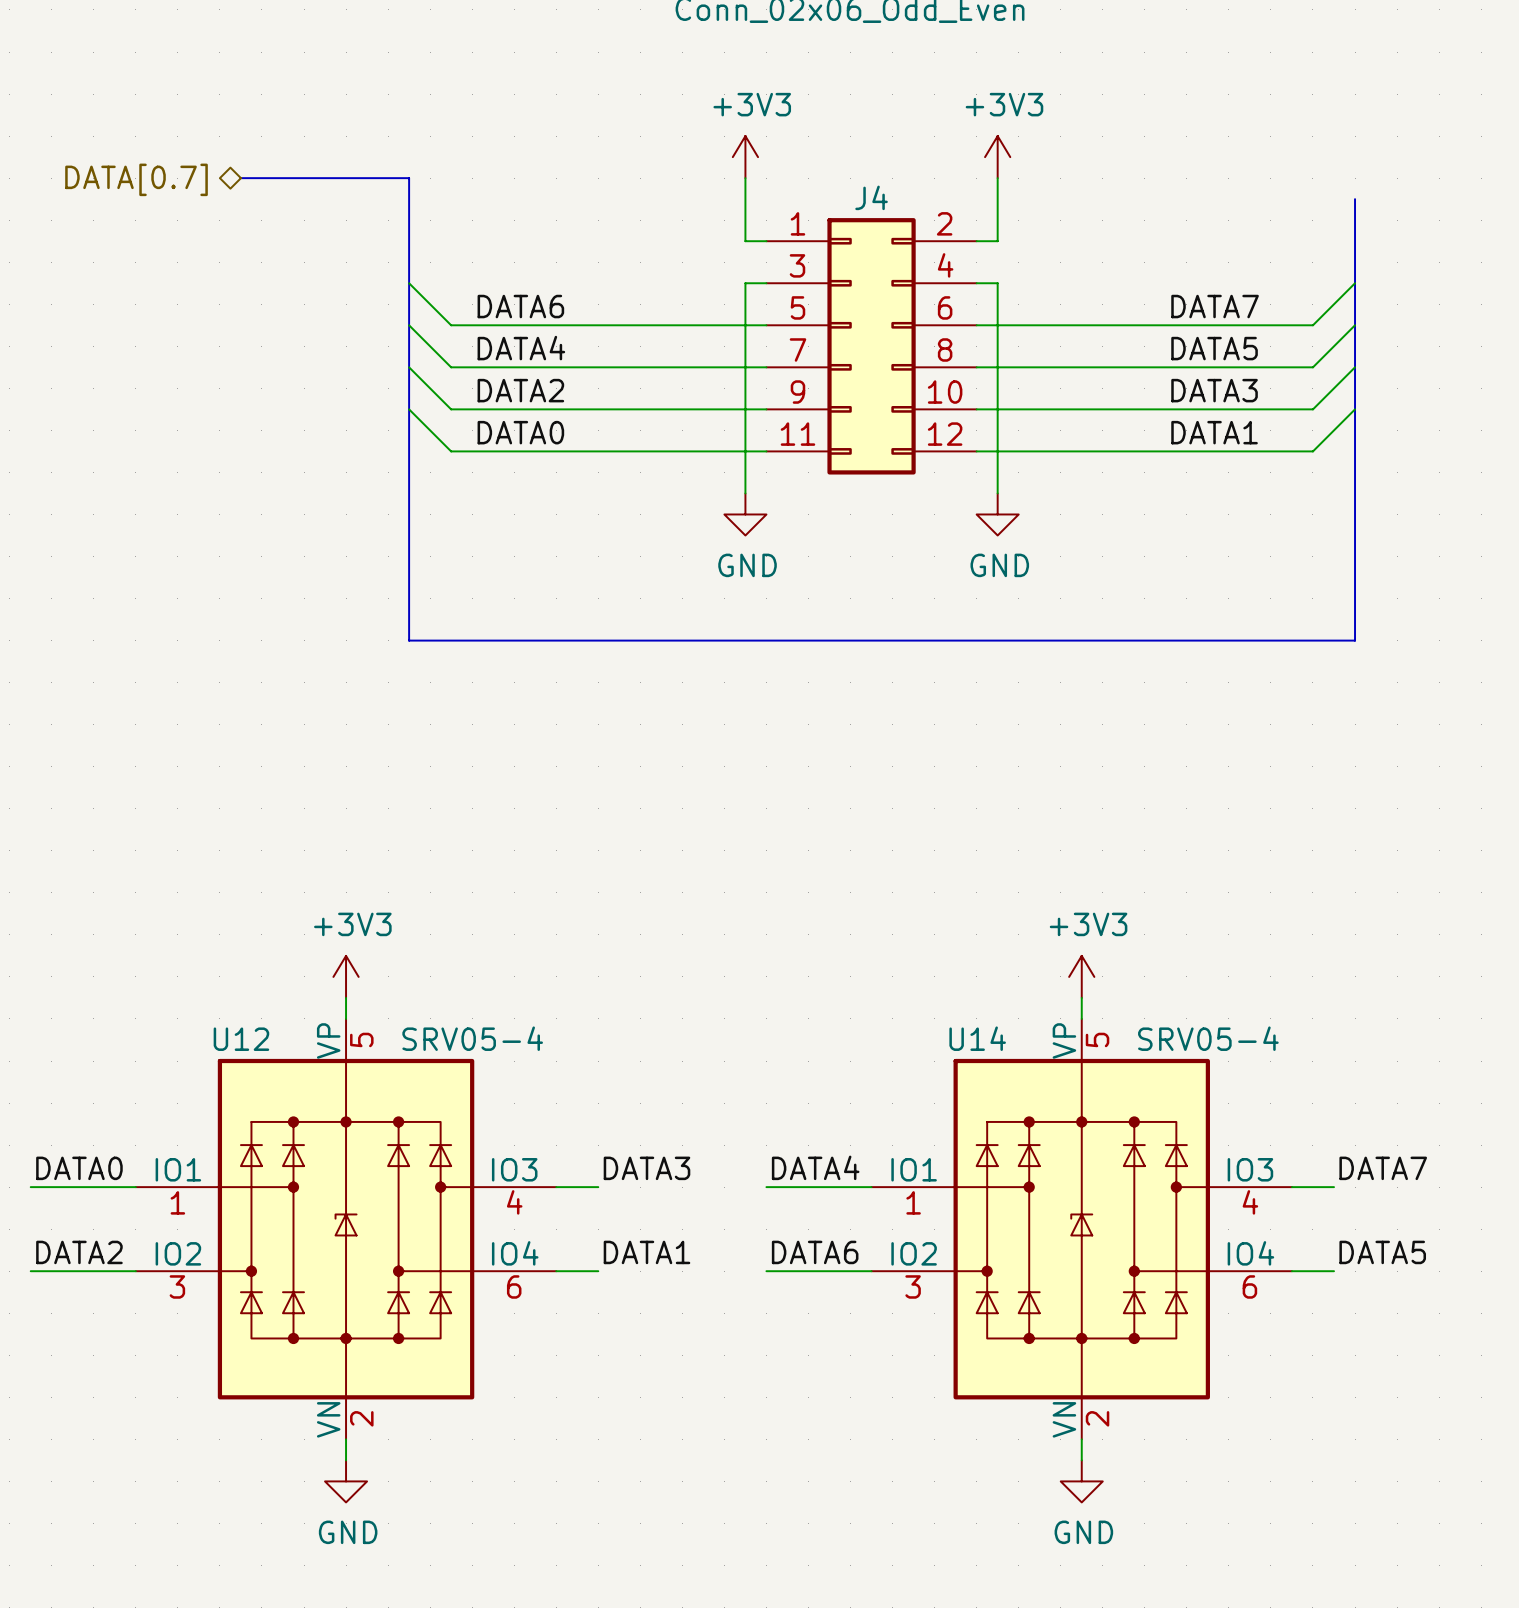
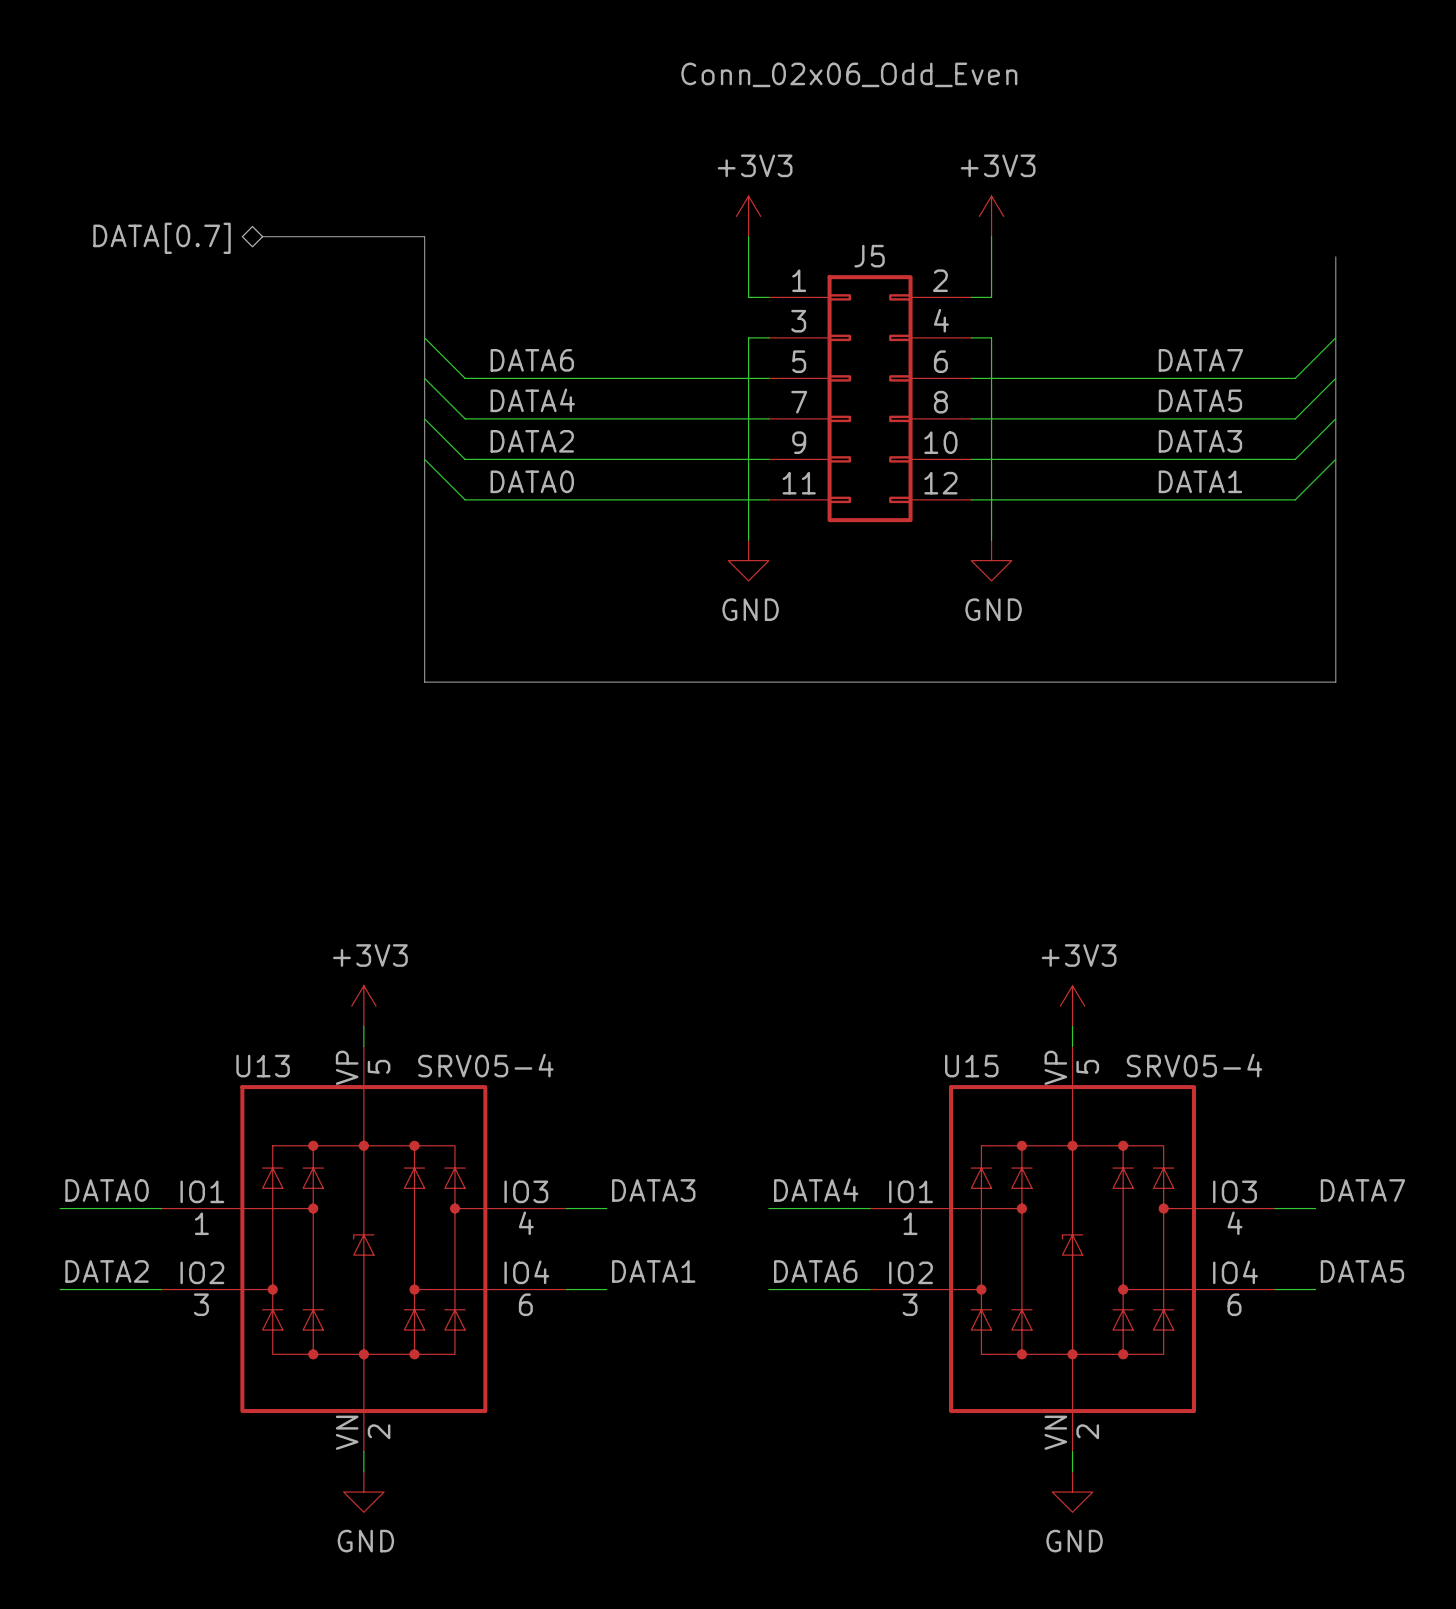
J4 name: J4 (871, 197) -> J5 (869, 256)
U14 name: U14 (977, 1038) -> U15 (971, 1066)
U12 name: U12 (241, 1039) -> U13 (263, 1066)

